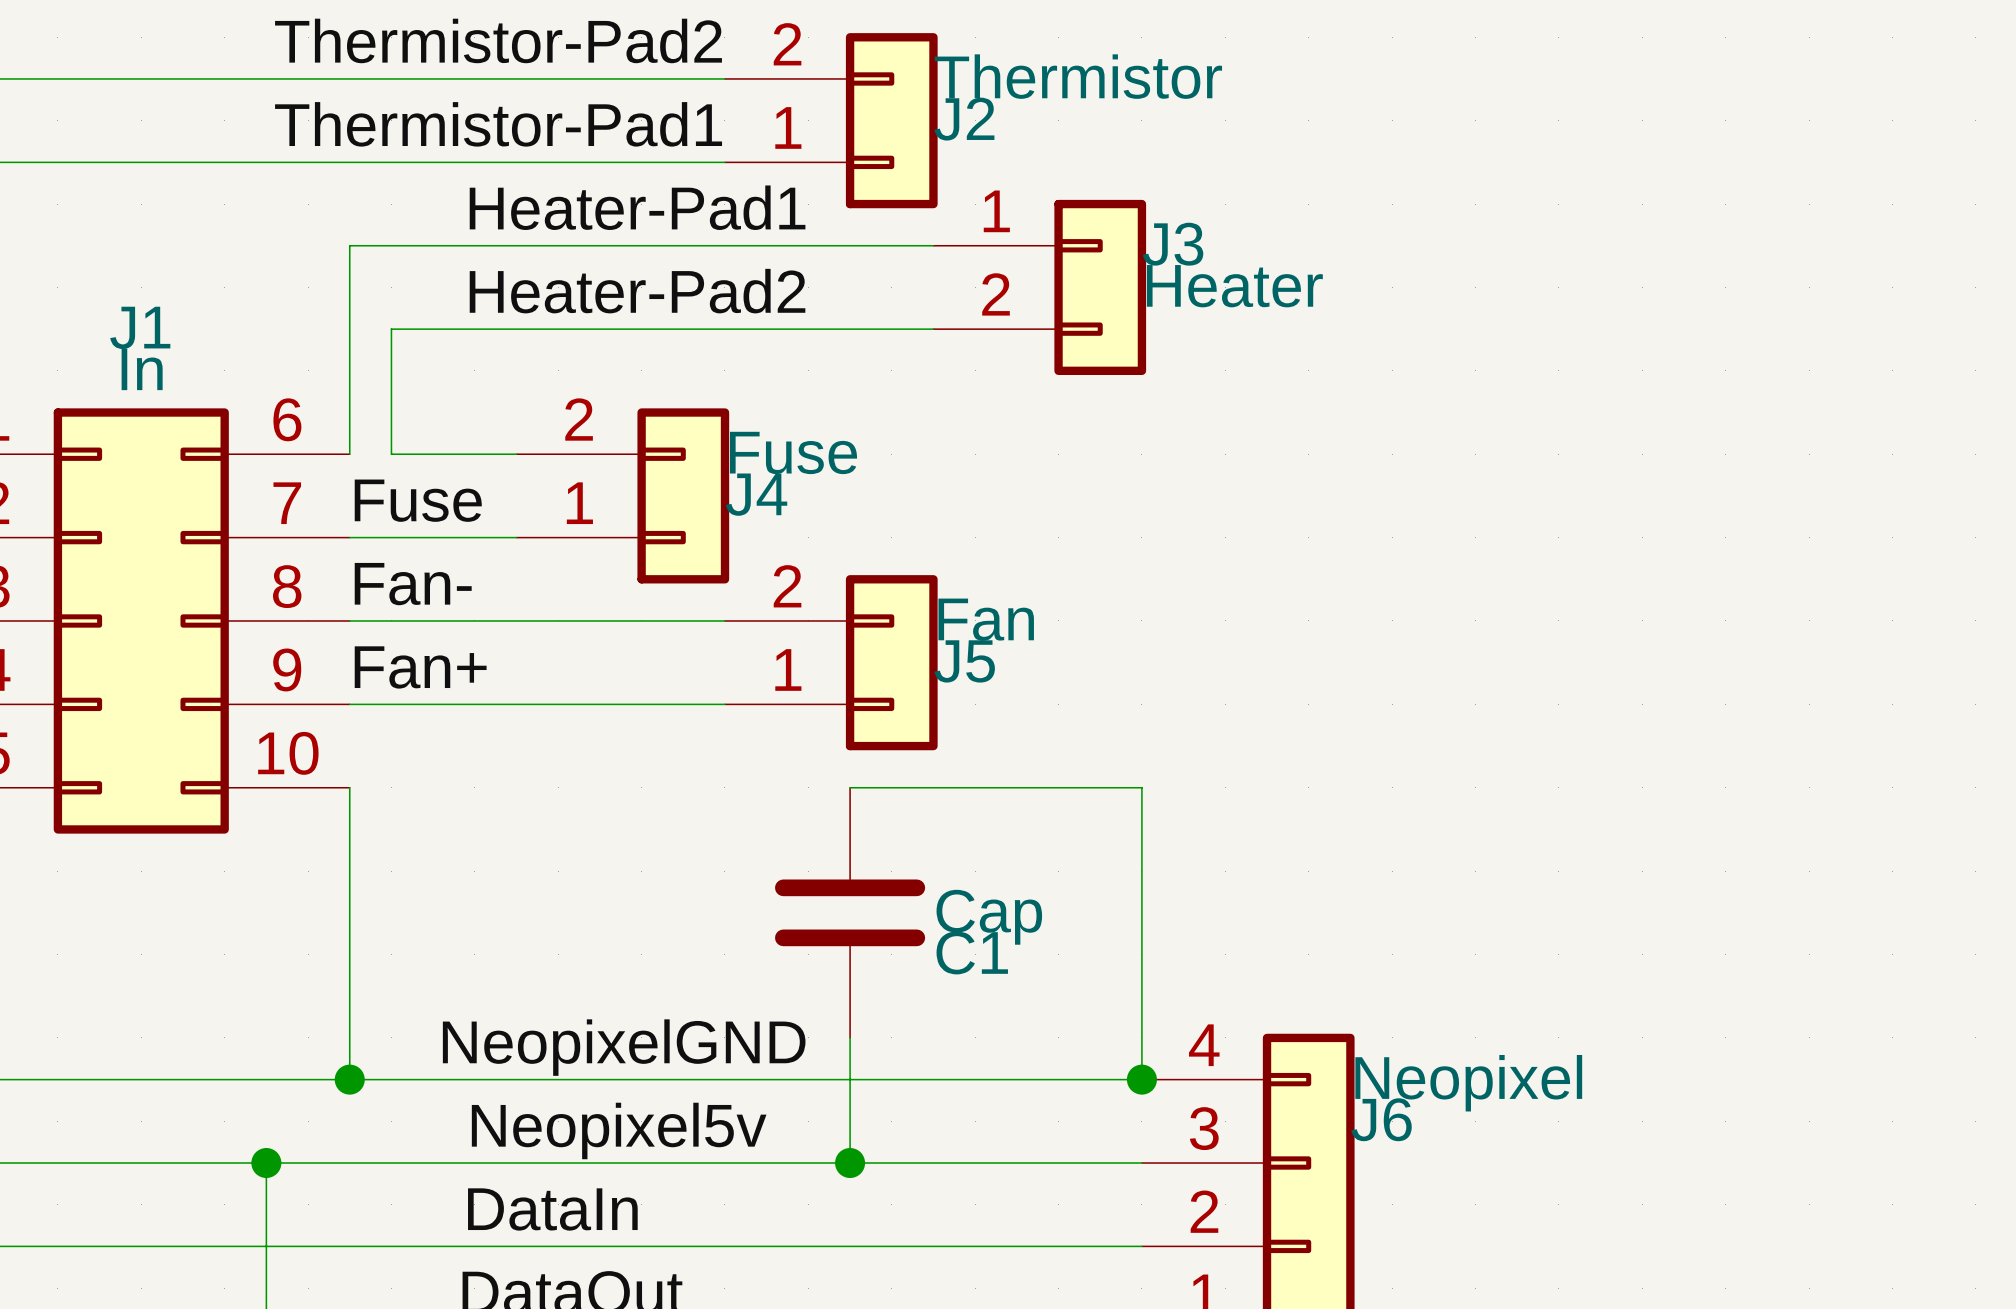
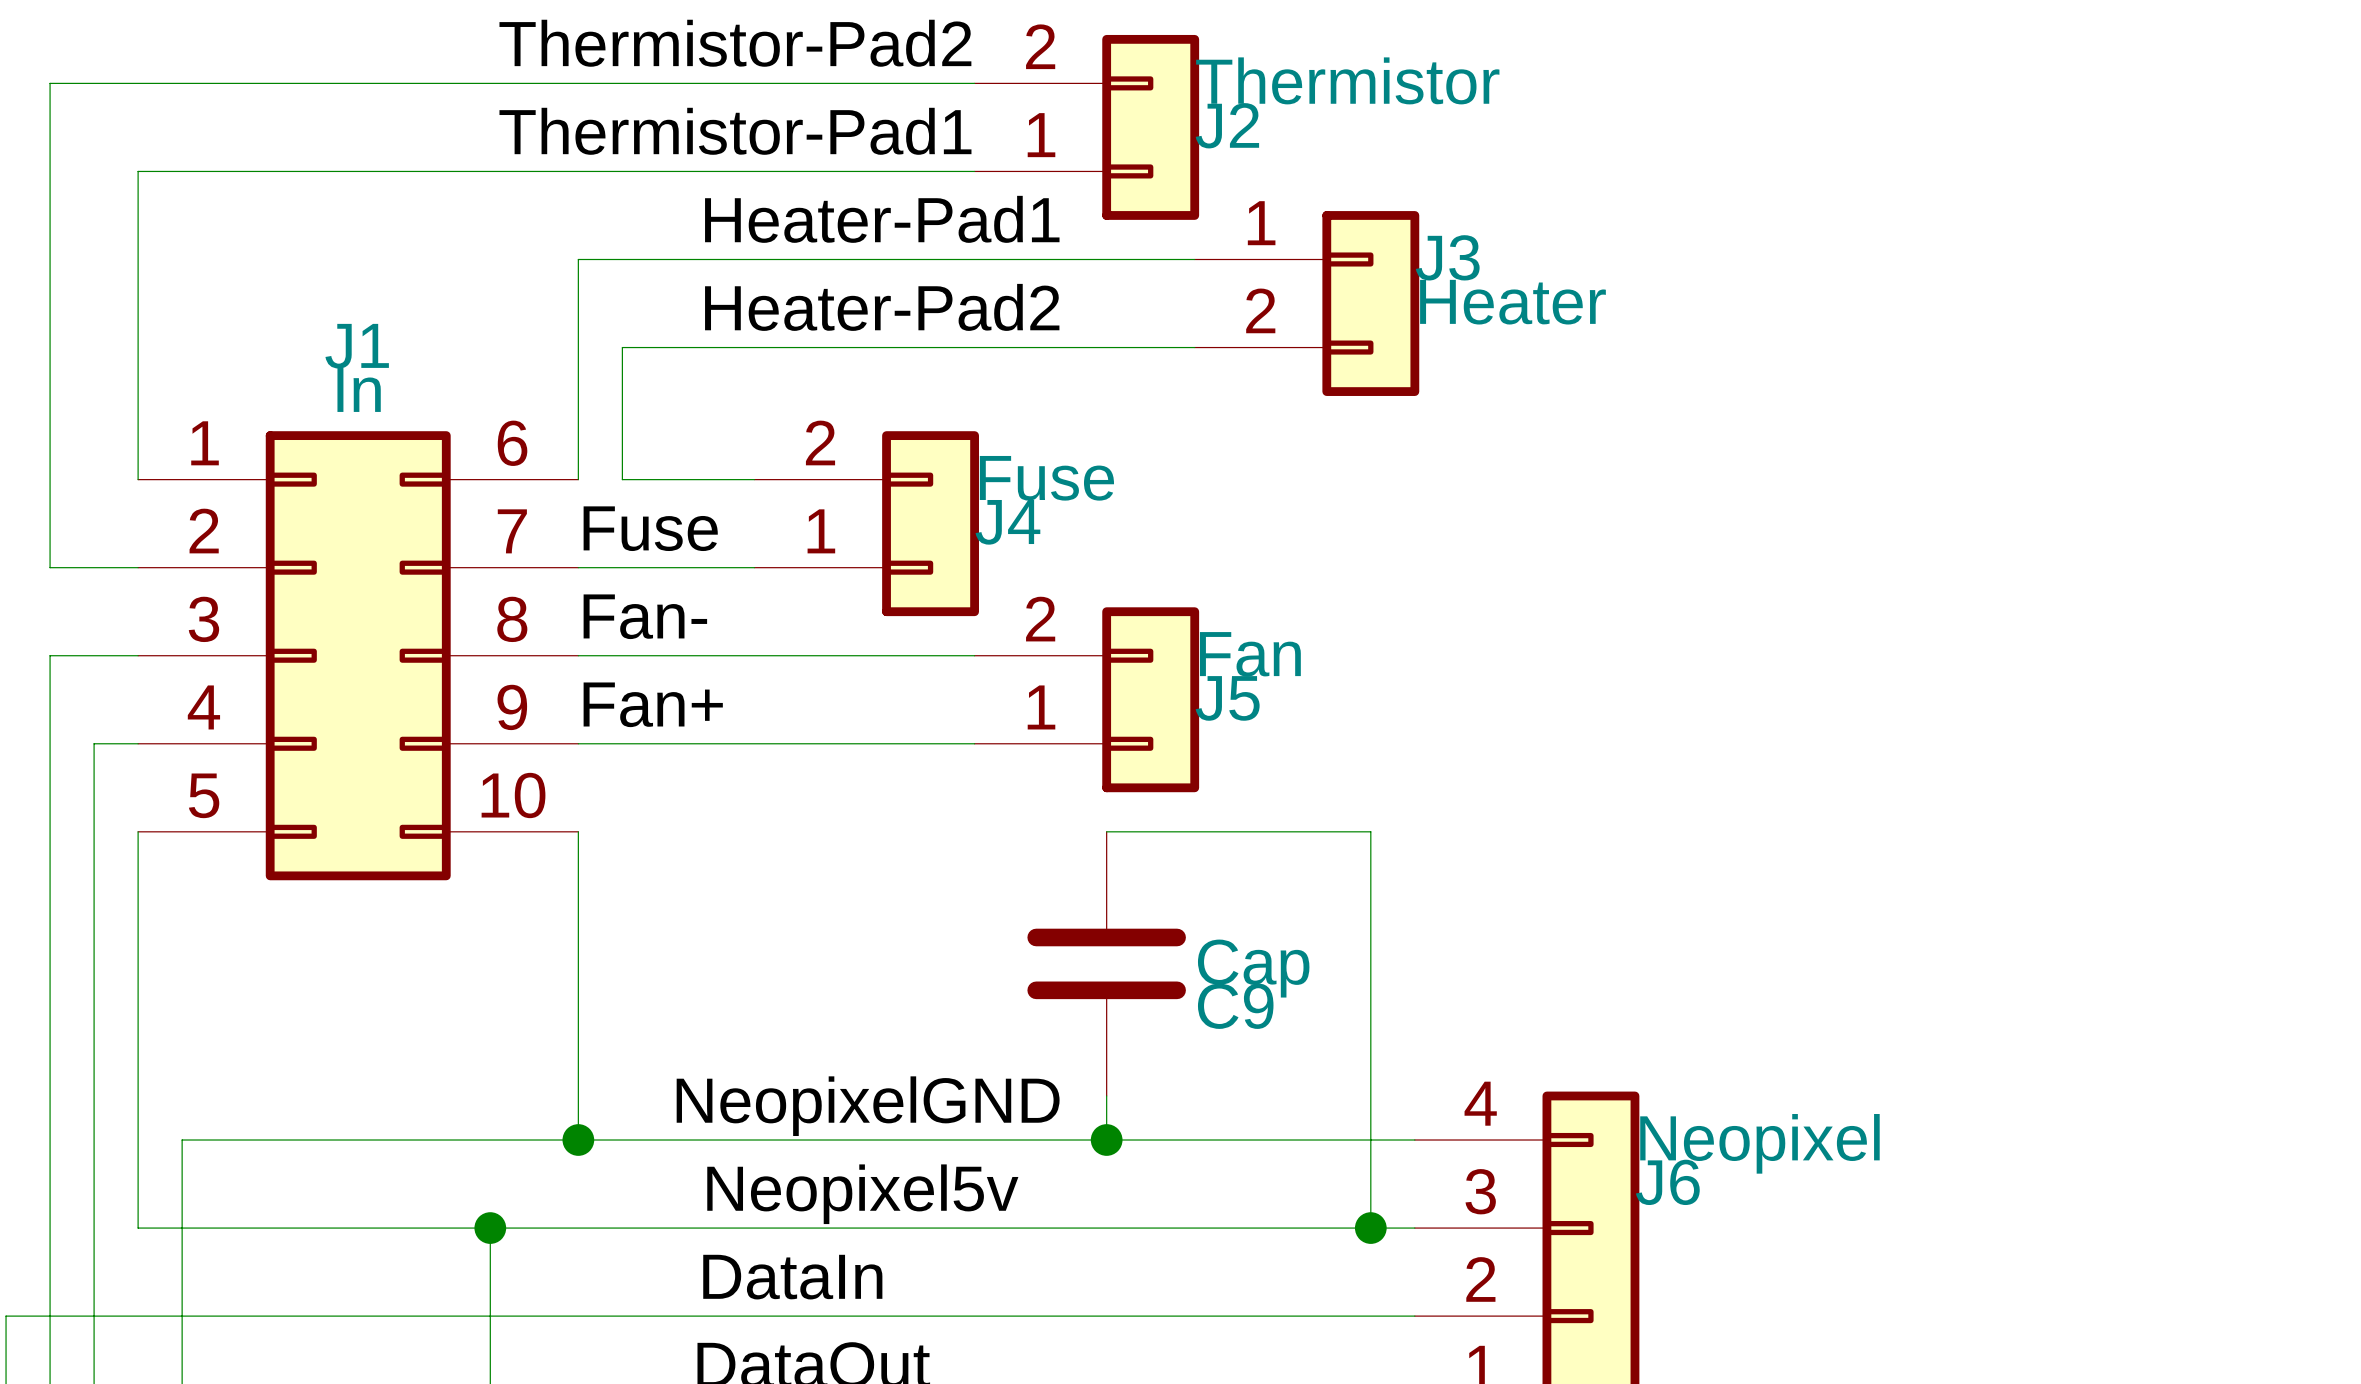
wire: (1100, 787) (1141, 787) (1141, 1079) -> (1370, 831) (1370, 1228)
C1 name: C1 (972, 952) -> C9 (1235, 1006)
wire: (850, 1079) (850, 1163) -> none
junction position: (1141, 1079) -> (1370, 1228)
junction position: (850, 1163) -> (1106, 1140)

